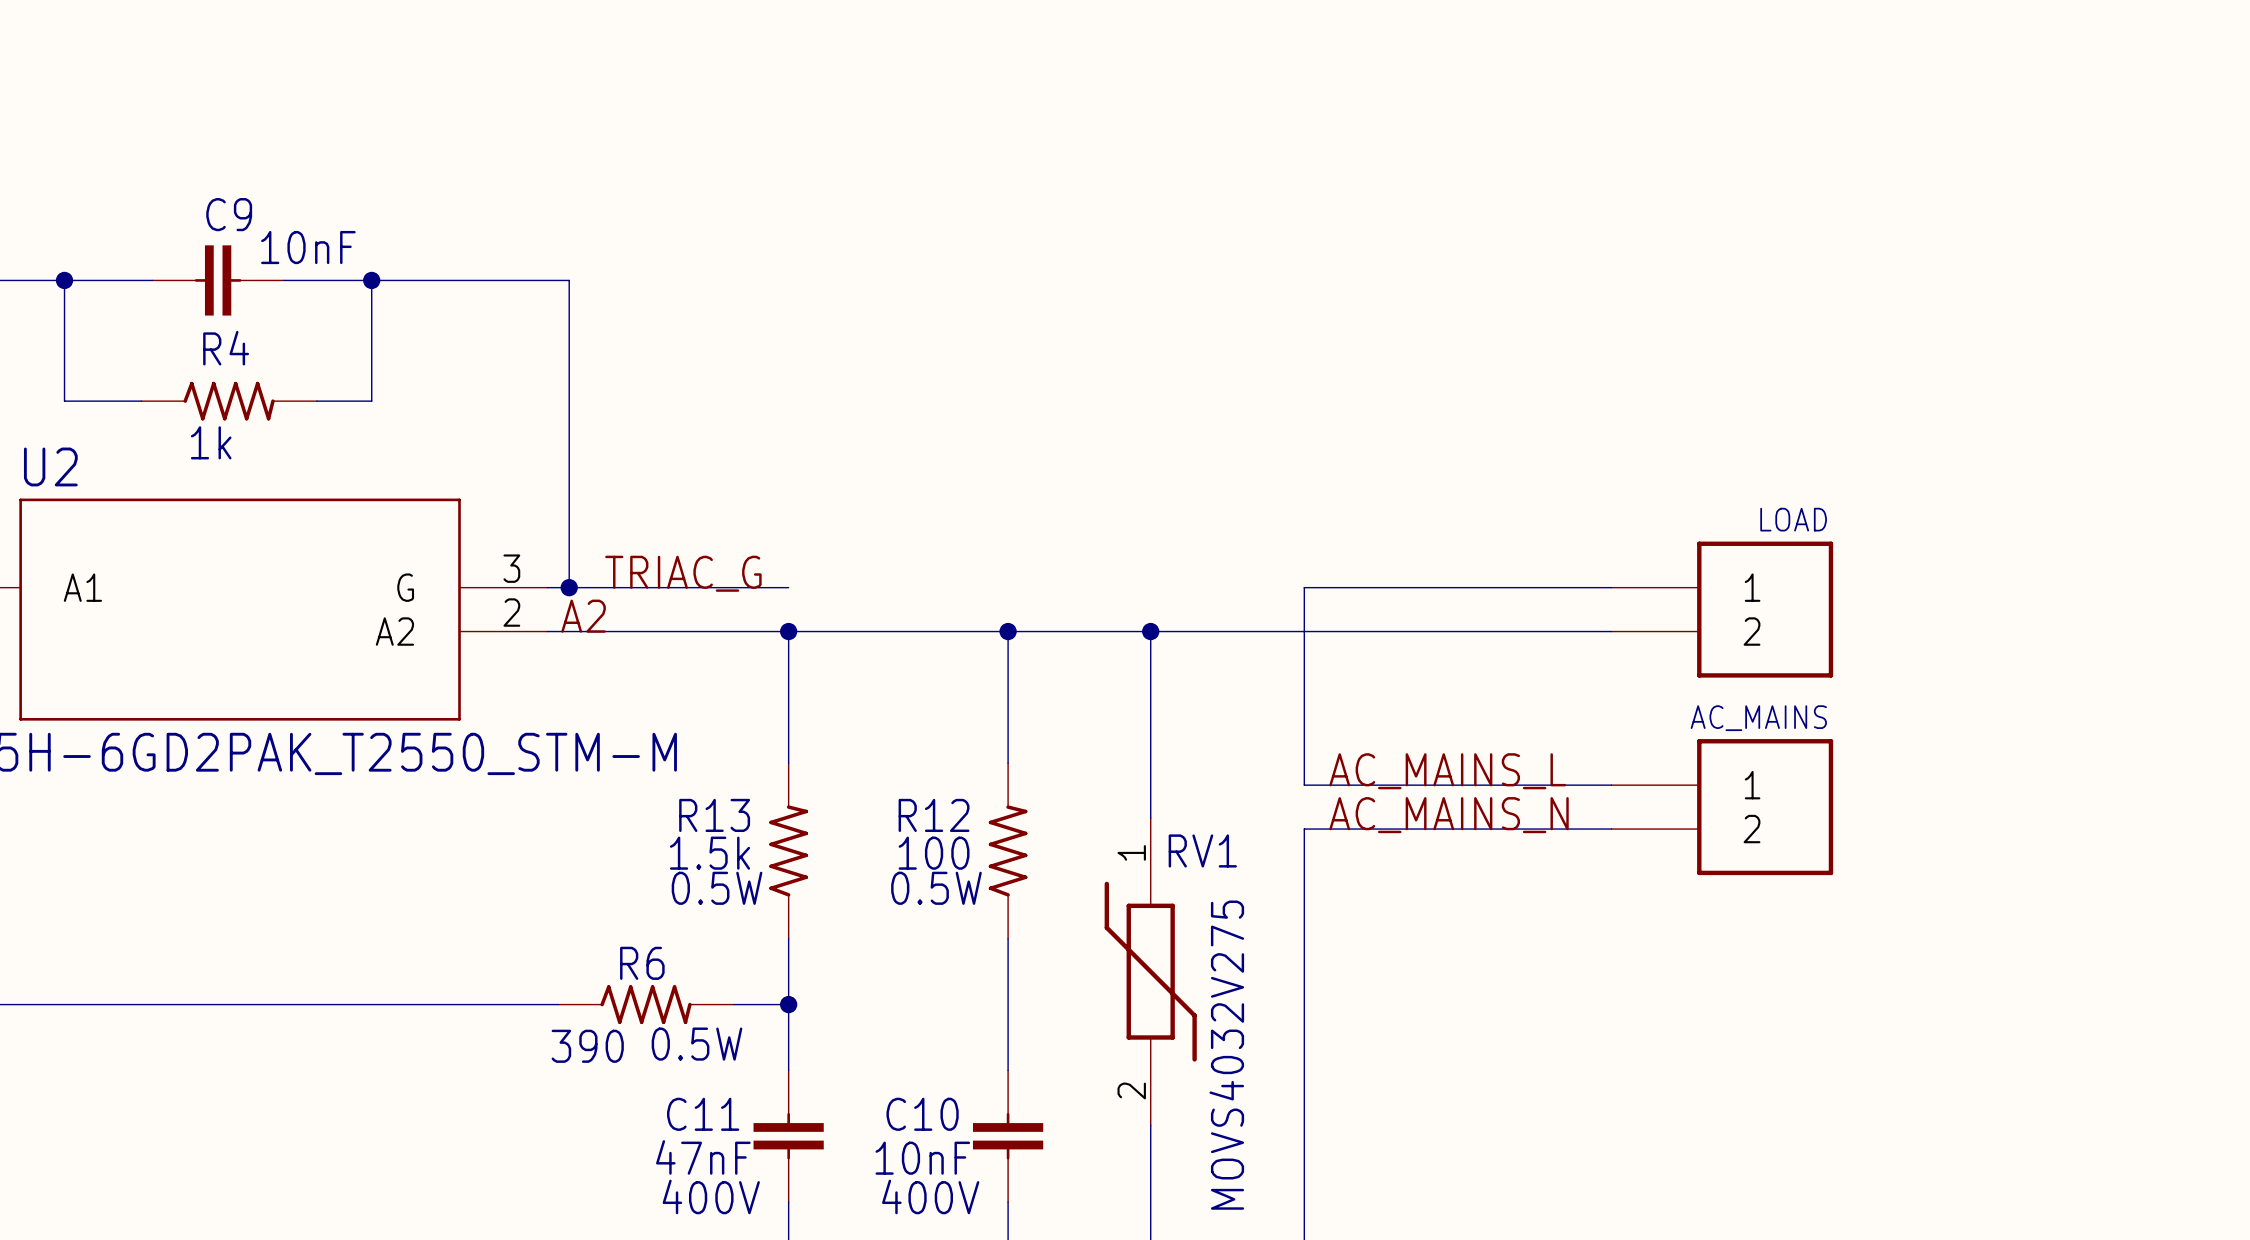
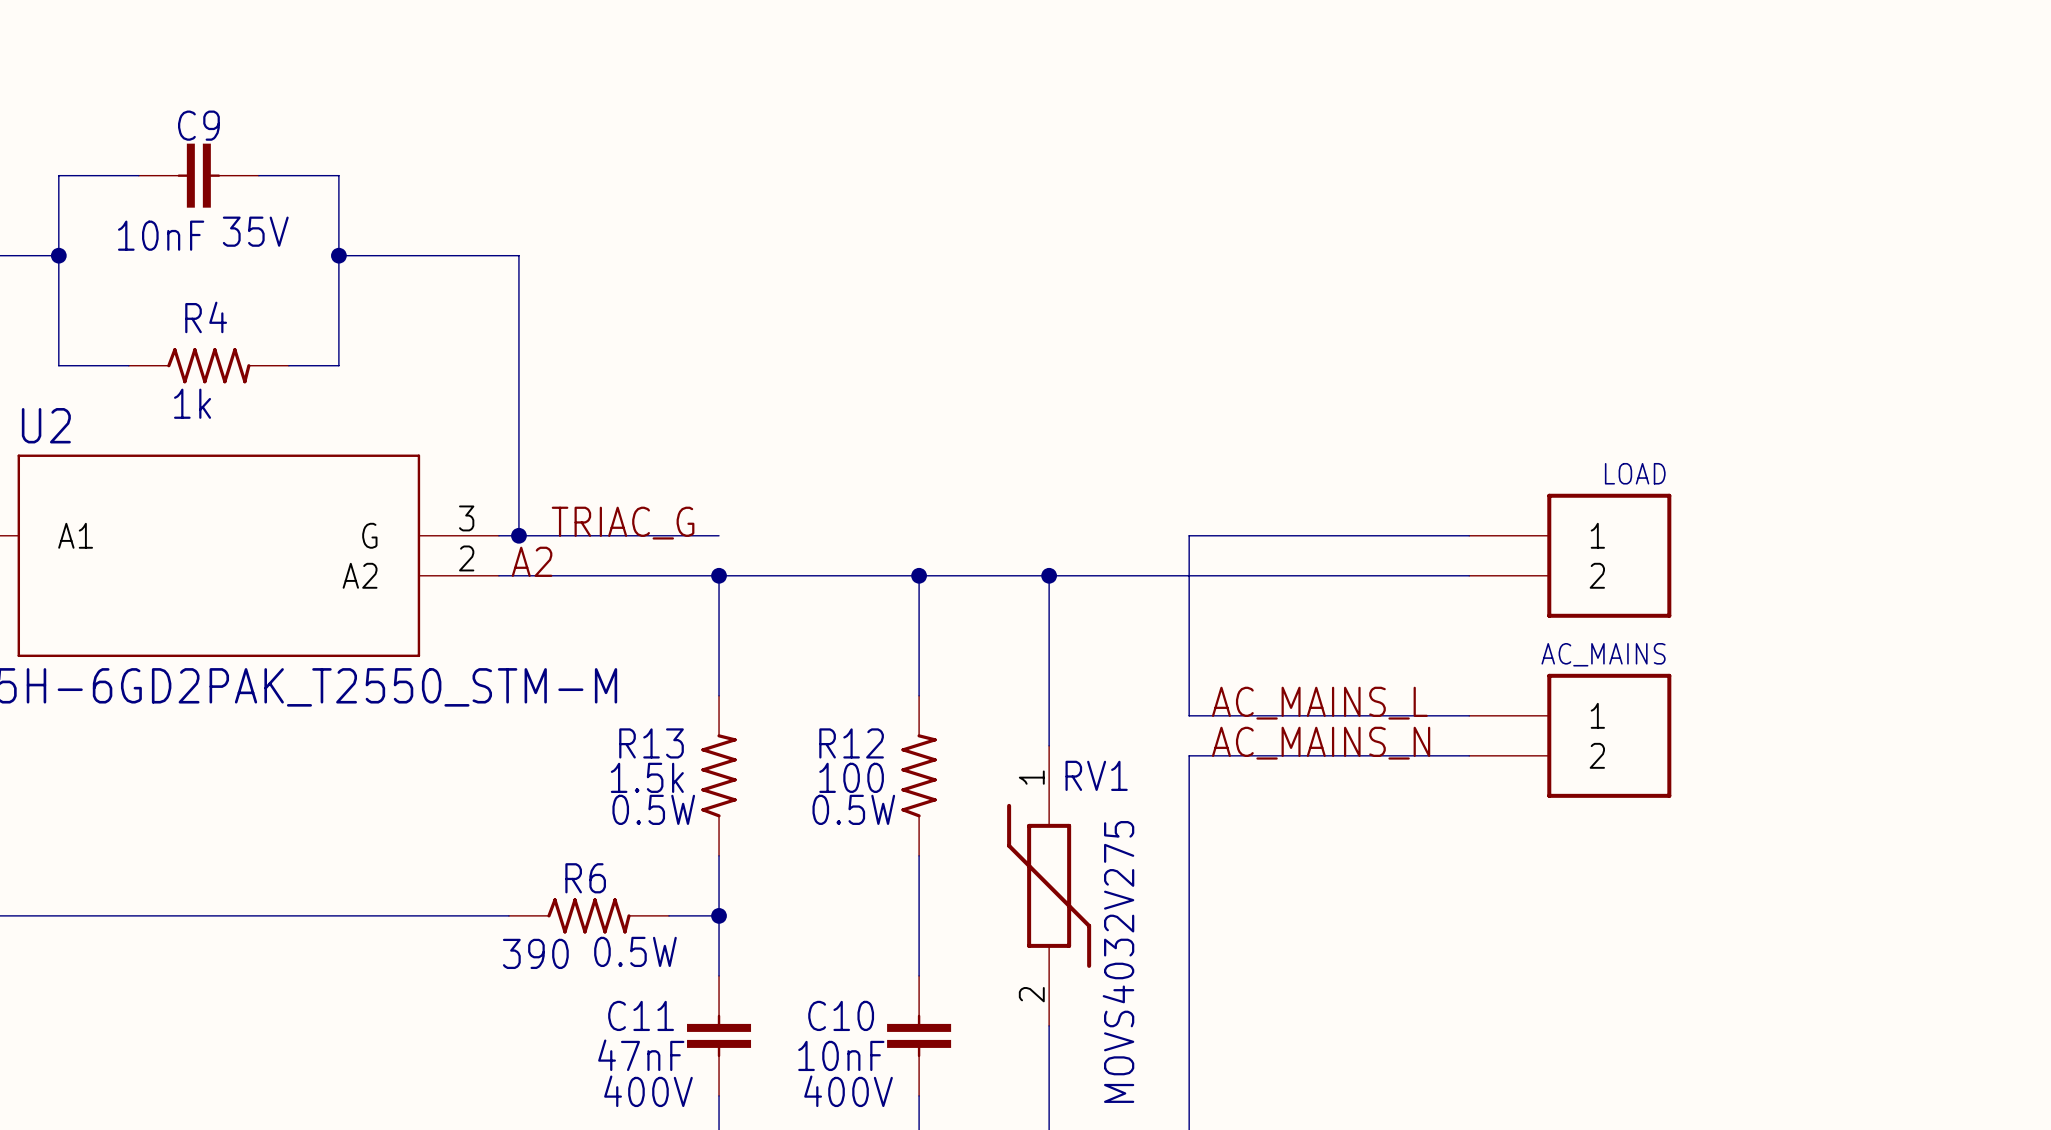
C9 name position: C9 (229, 214) -> C9 (198, 125)
C9 value position: 10nF (308, 247) -> 10nF (161, 235)
C9 text: none -> 35V (255, 231)
wire: (64, 280) (152, 280) -> (58, 255) (58, 175) (138, 175)
C9 position: (218, 280) -> (198, 175)
wire: (283, 280) (371, 280) -> (258, 175) (338, 175) (338, 255)

